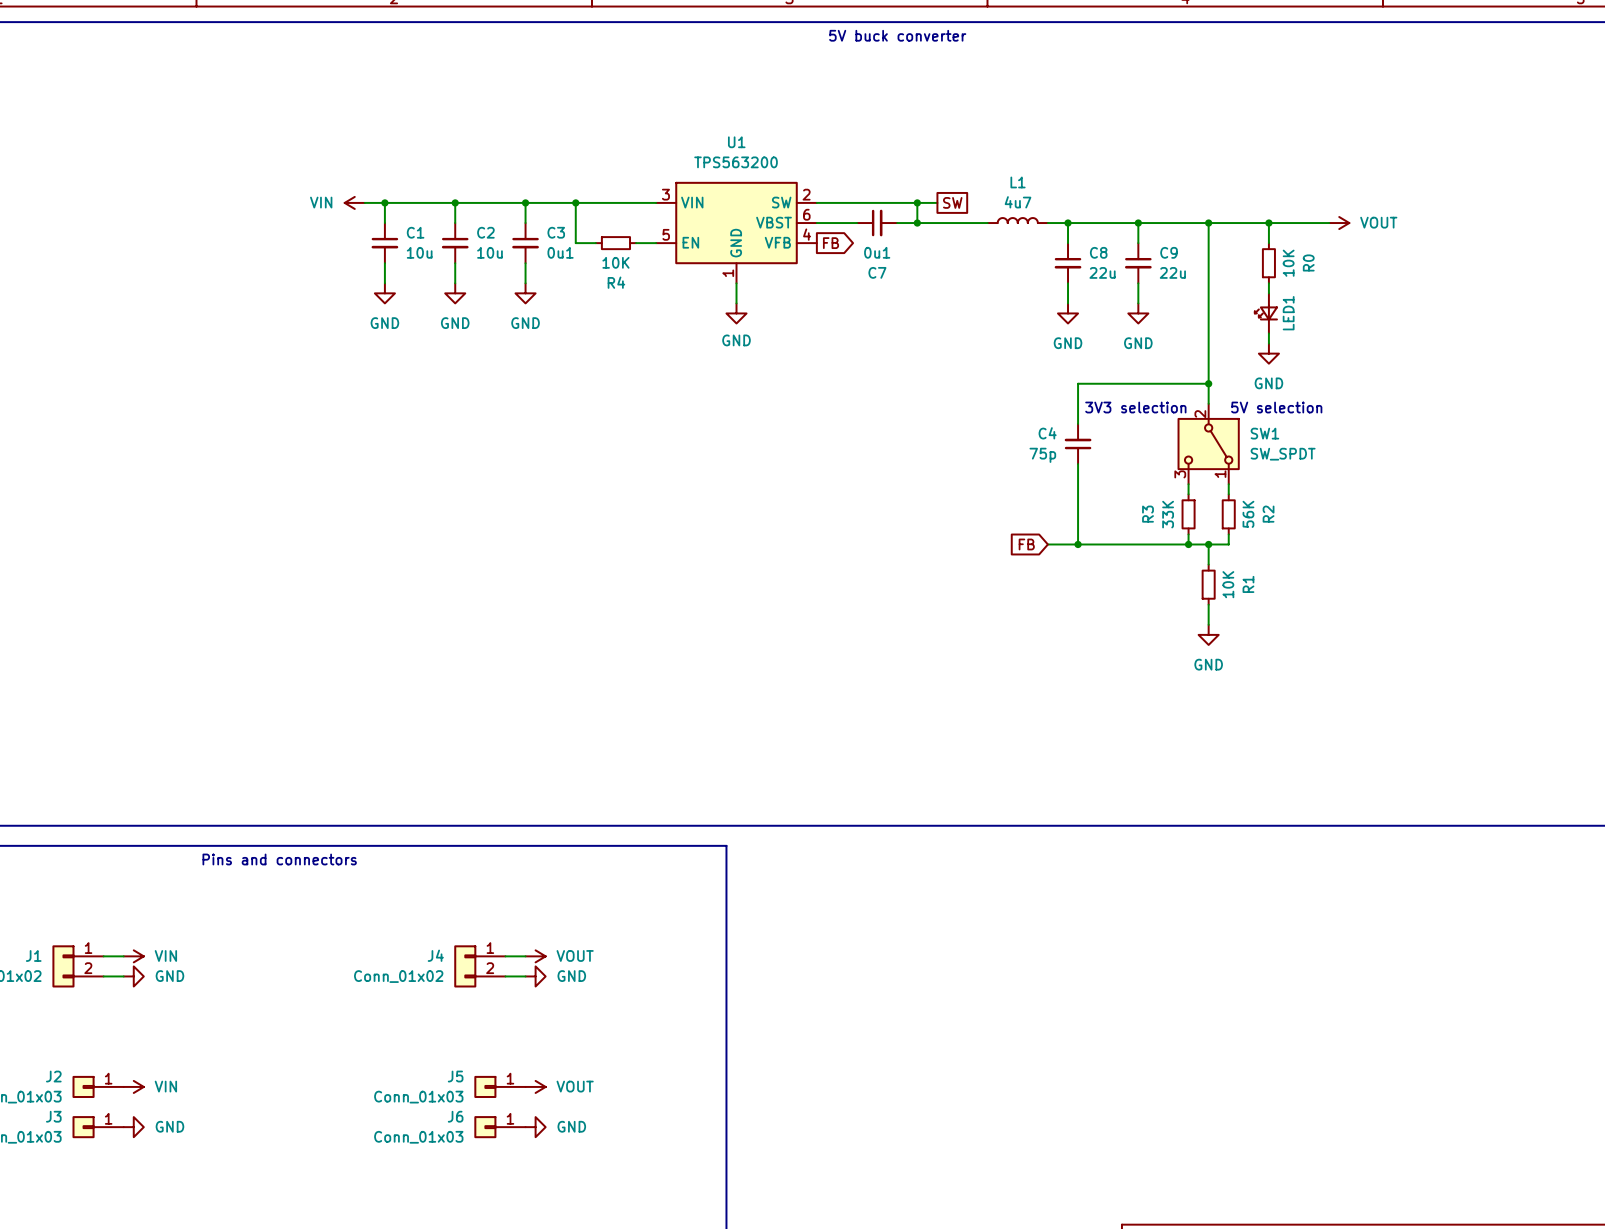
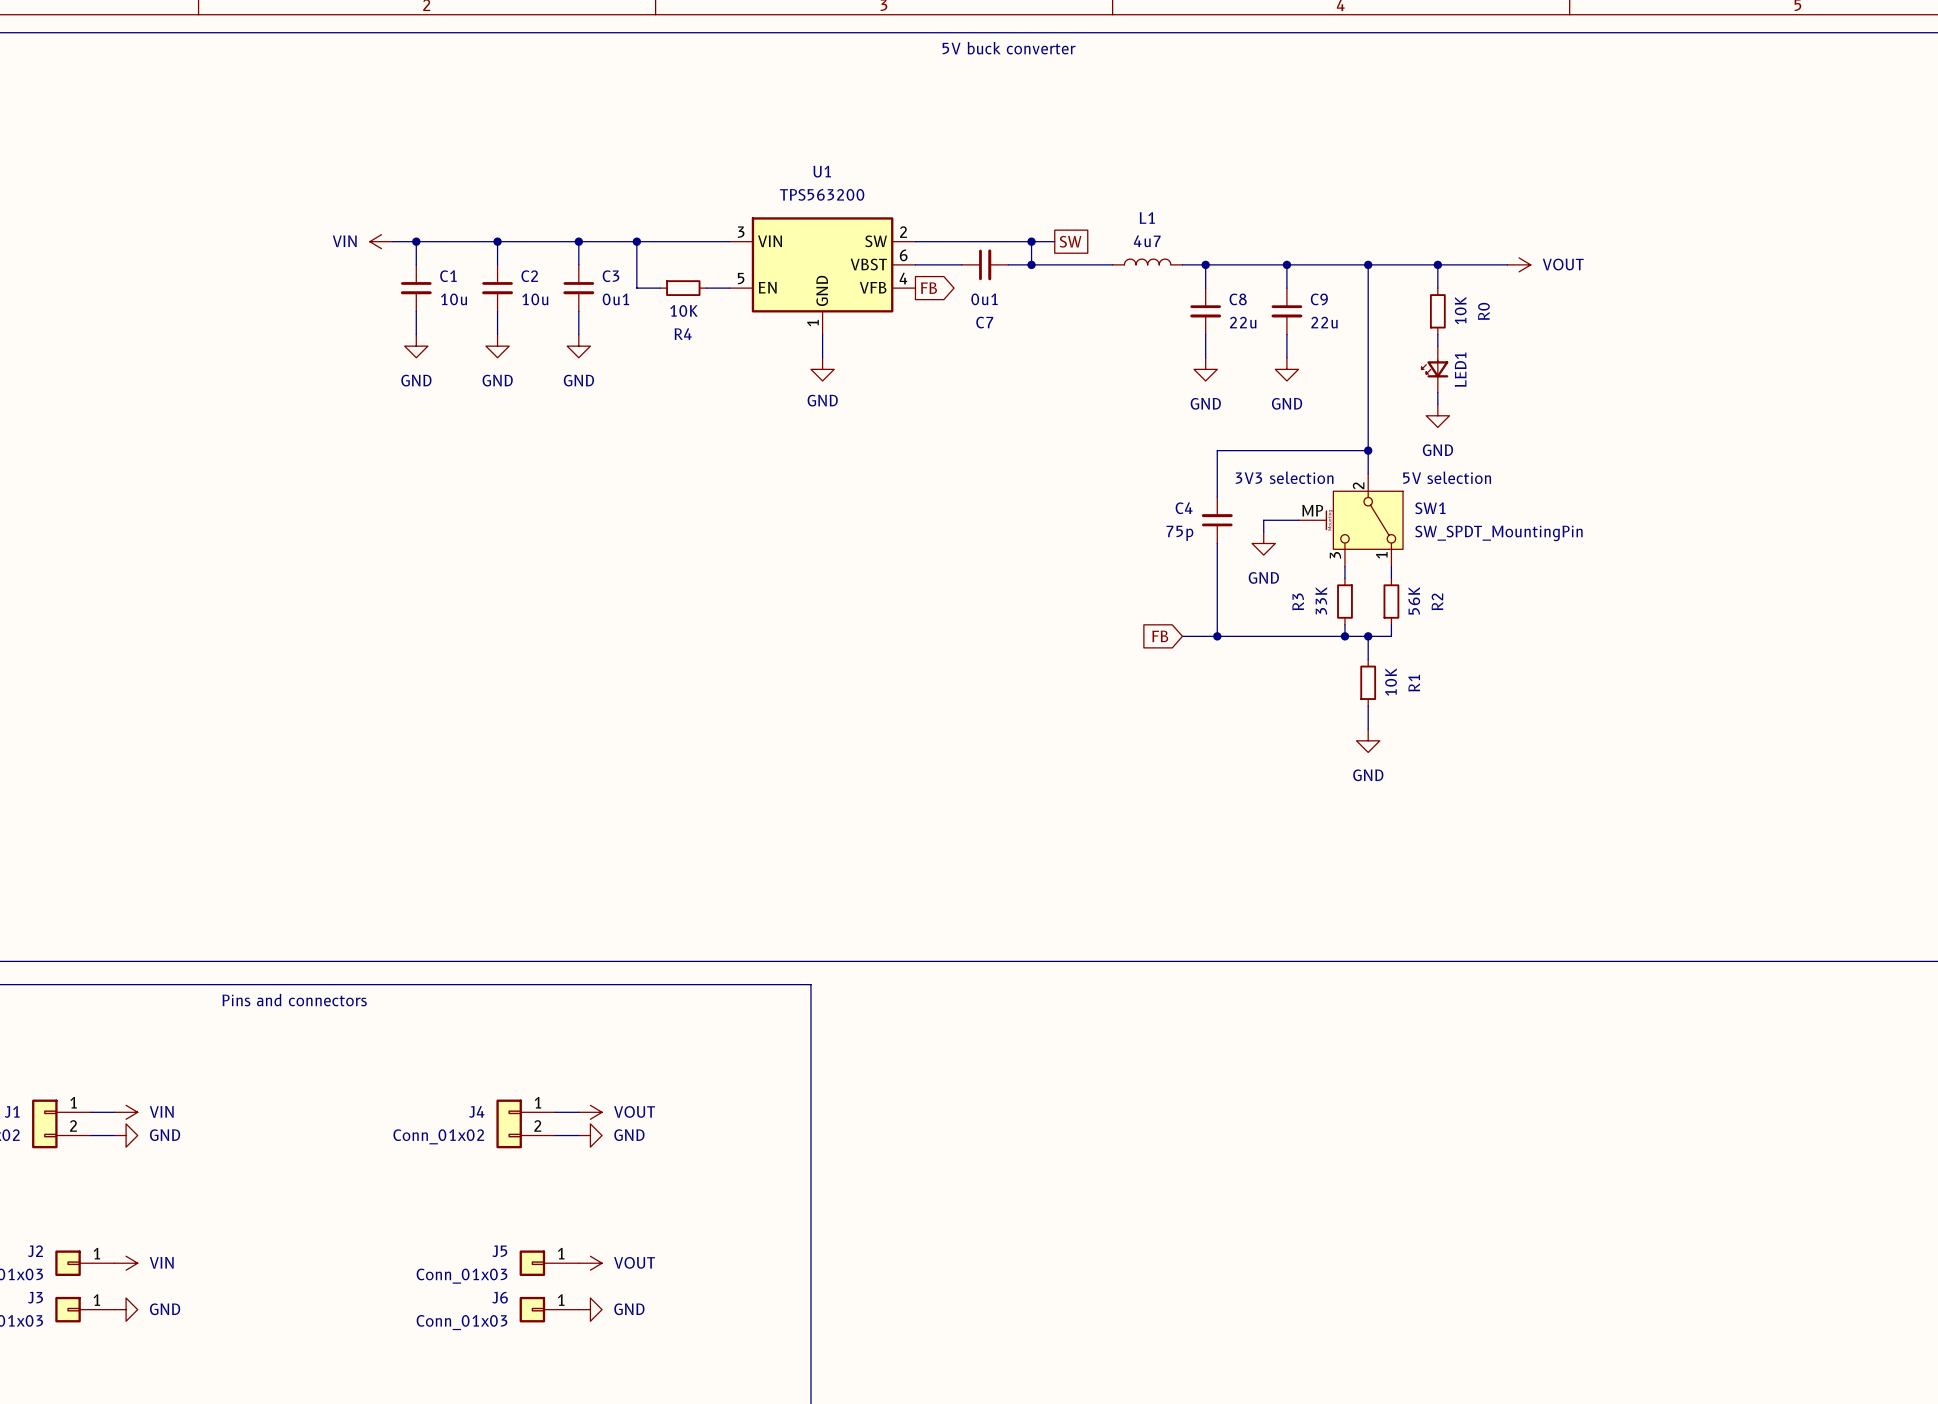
SW1 symbol: [1178, 403, 1239, 485] -> [1298, 473, 1404, 567]
wire: none -> (1298, 520) (1263, 520) (1263, 531)
SW1 value: SW_SPDT (1283, 454) -> SW_SPDT_MountingPin (1498, 533)
power symbol: none -> GND (1263, 543)

